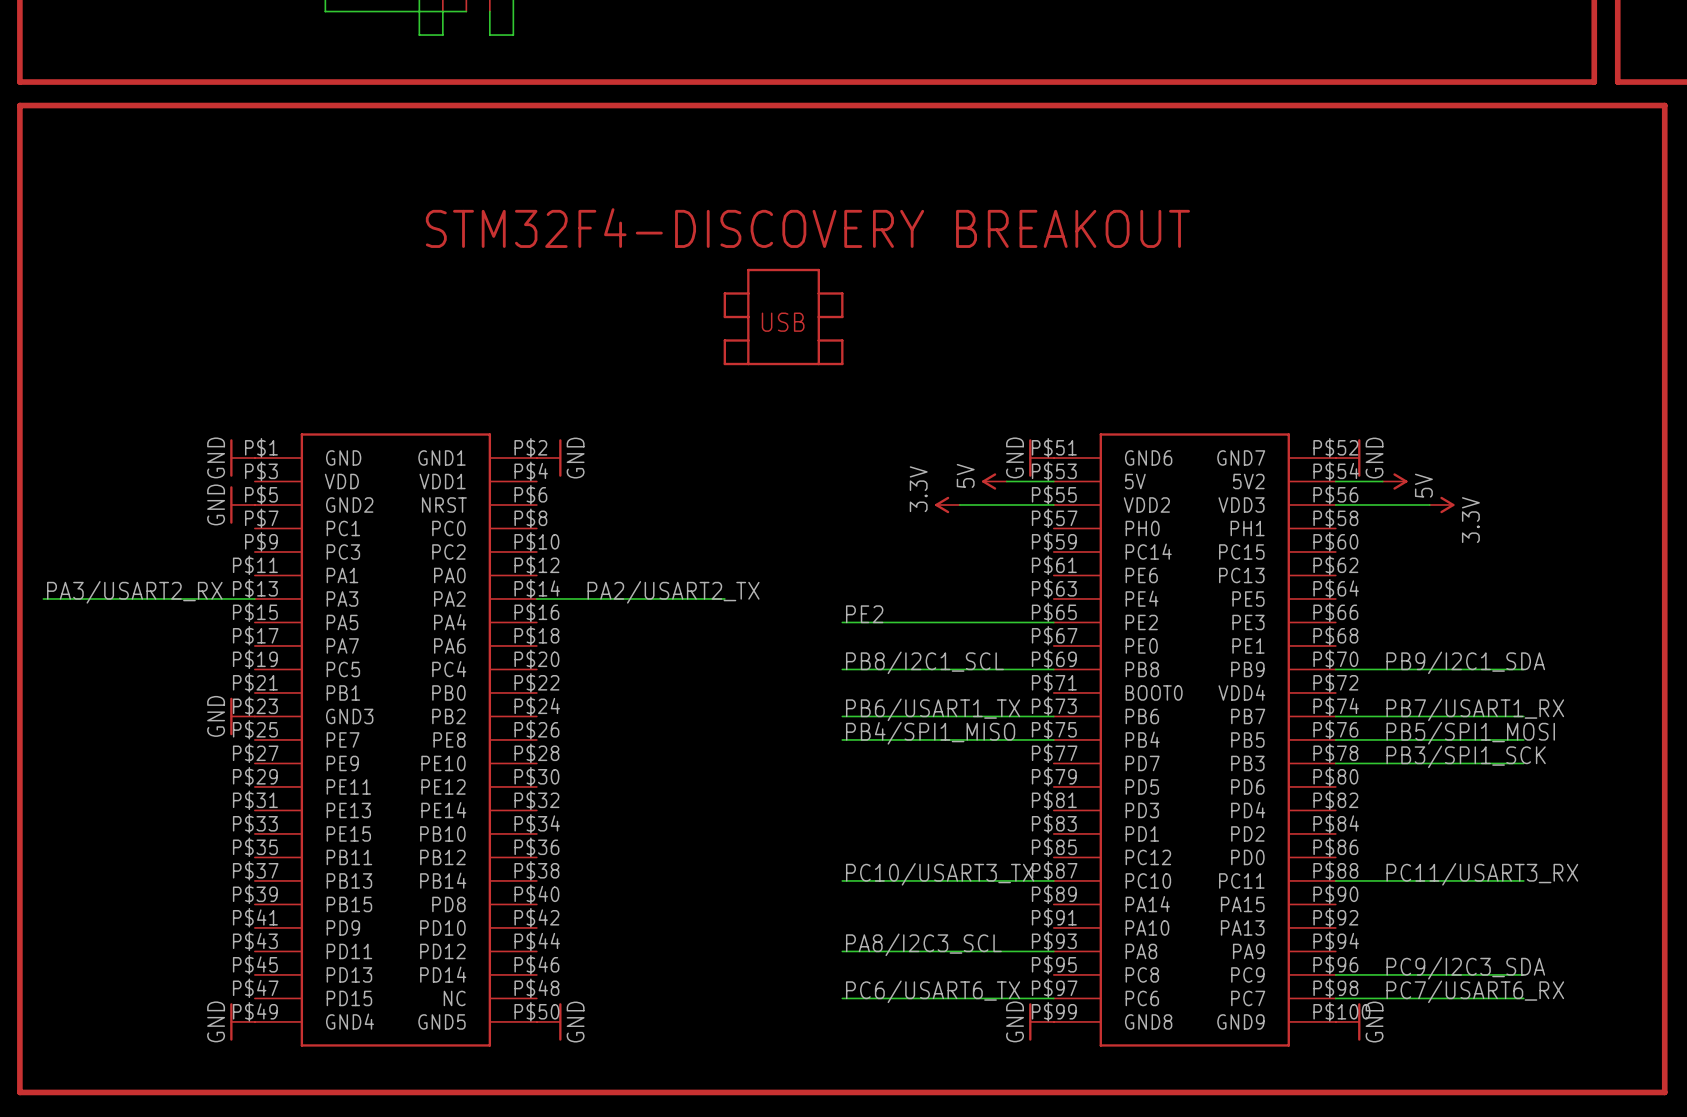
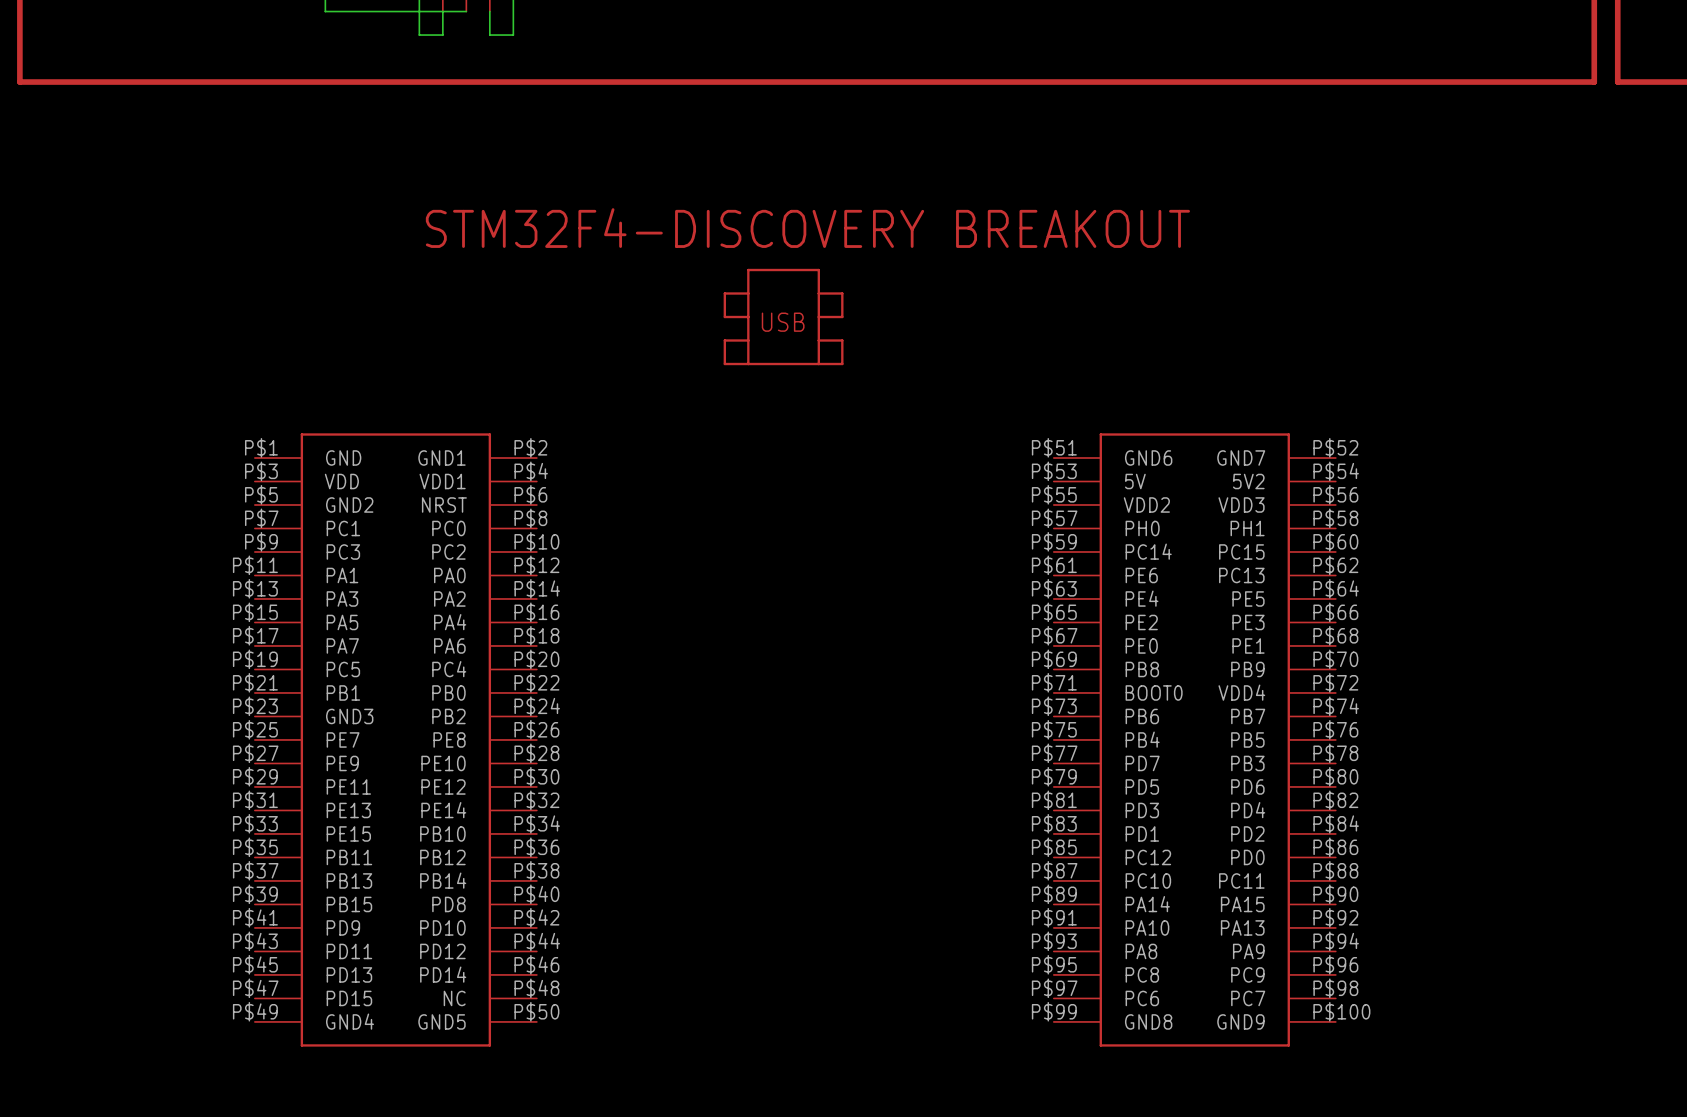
line: (19, 105) (19, 1092) (1664, 1092) (1664, 105) (19, 105) -> none
power symbol: GND (242, 458) -> none
power symbol: GND (549, 458) -> none
power symbol: GND (1041, 458) -> none
power symbol: GND (1348, 458) -> none
power symbol: 5V (994, 481) -> none
wire: (1006, 481) (1053, 481) -> none
wire: (1335, 481) (1382, 481) -> none
power symbol: 5V (1395, 481) -> none
power symbol: GND (242, 504) -> none
power symbol: 3.3V (947, 504) -> none
wire: (959, 504) (1053, 504) -> none
wire: (1335, 504) (1429, 504) -> none
power symbol: 3.3V (1442, 504) -> none
label: PA3/USART2_RX (134, 592) -> none
label: PA2/USART2_TX (673, 592) -> none
wire: (43, 598) (254, 598) -> none
wire: (536, 598) (724, 598) -> none
label: PE2 (864, 614) -> none
wire: (842, 622) (1053, 622) -> none
label: PB8/I2C1_SCL (924, 662) -> none
label: PB9/I2C1_SDA (1465, 662) -> none
wire: (842, 669) (1053, 669) -> none
wire: (1335, 669) (1523, 669) -> none
label: PB6/USART1_TX (933, 709) -> none
label: PB7/USART1_RX (1475, 709) -> none
power symbol: GND (242, 716) -> none
wire: (842, 716) (1053, 716) -> none
wire: (1335, 716) (1523, 716) -> none
label: PB4/SPI1_MISO (930, 733) -> none
label: PB5/SPI1_MOSI (1470, 733) -> none
wire: (842, 739) (1053, 739) -> none
wire: (1335, 739) (1523, 739) -> none
label: PB3/SPI1_SCK (1466, 756) -> none
wire: (1335, 763) (1523, 763) -> none
label: PC10/USART3_TX (940, 874) -> none
label: PC11/USART3_RX (1482, 874) -> none
wire: (842, 880) (1053, 880) -> none
wire: (1335, 880) (1523, 880) -> none
label: PA8/I2C3_SCL (923, 944) -> none
wire: (842, 951) (1053, 951) -> none
label: PC9/I2C3_SDA (1465, 968) -> none
wire: (1335, 974) (1523, 974) -> none
label: PC6/USART6_TX (933, 991) -> none
label: PC7/USART6_RX (1475, 991) -> none
wire: (842, 998) (1053, 998) -> none
wire: (1335, 998) (1523, 998) -> none
power symbol: GND (242, 1021) -> none
power symbol: GND (549, 1021) -> none
power symbol: GND (1041, 1021) -> none
power symbol: GND (1348, 1021) -> none

